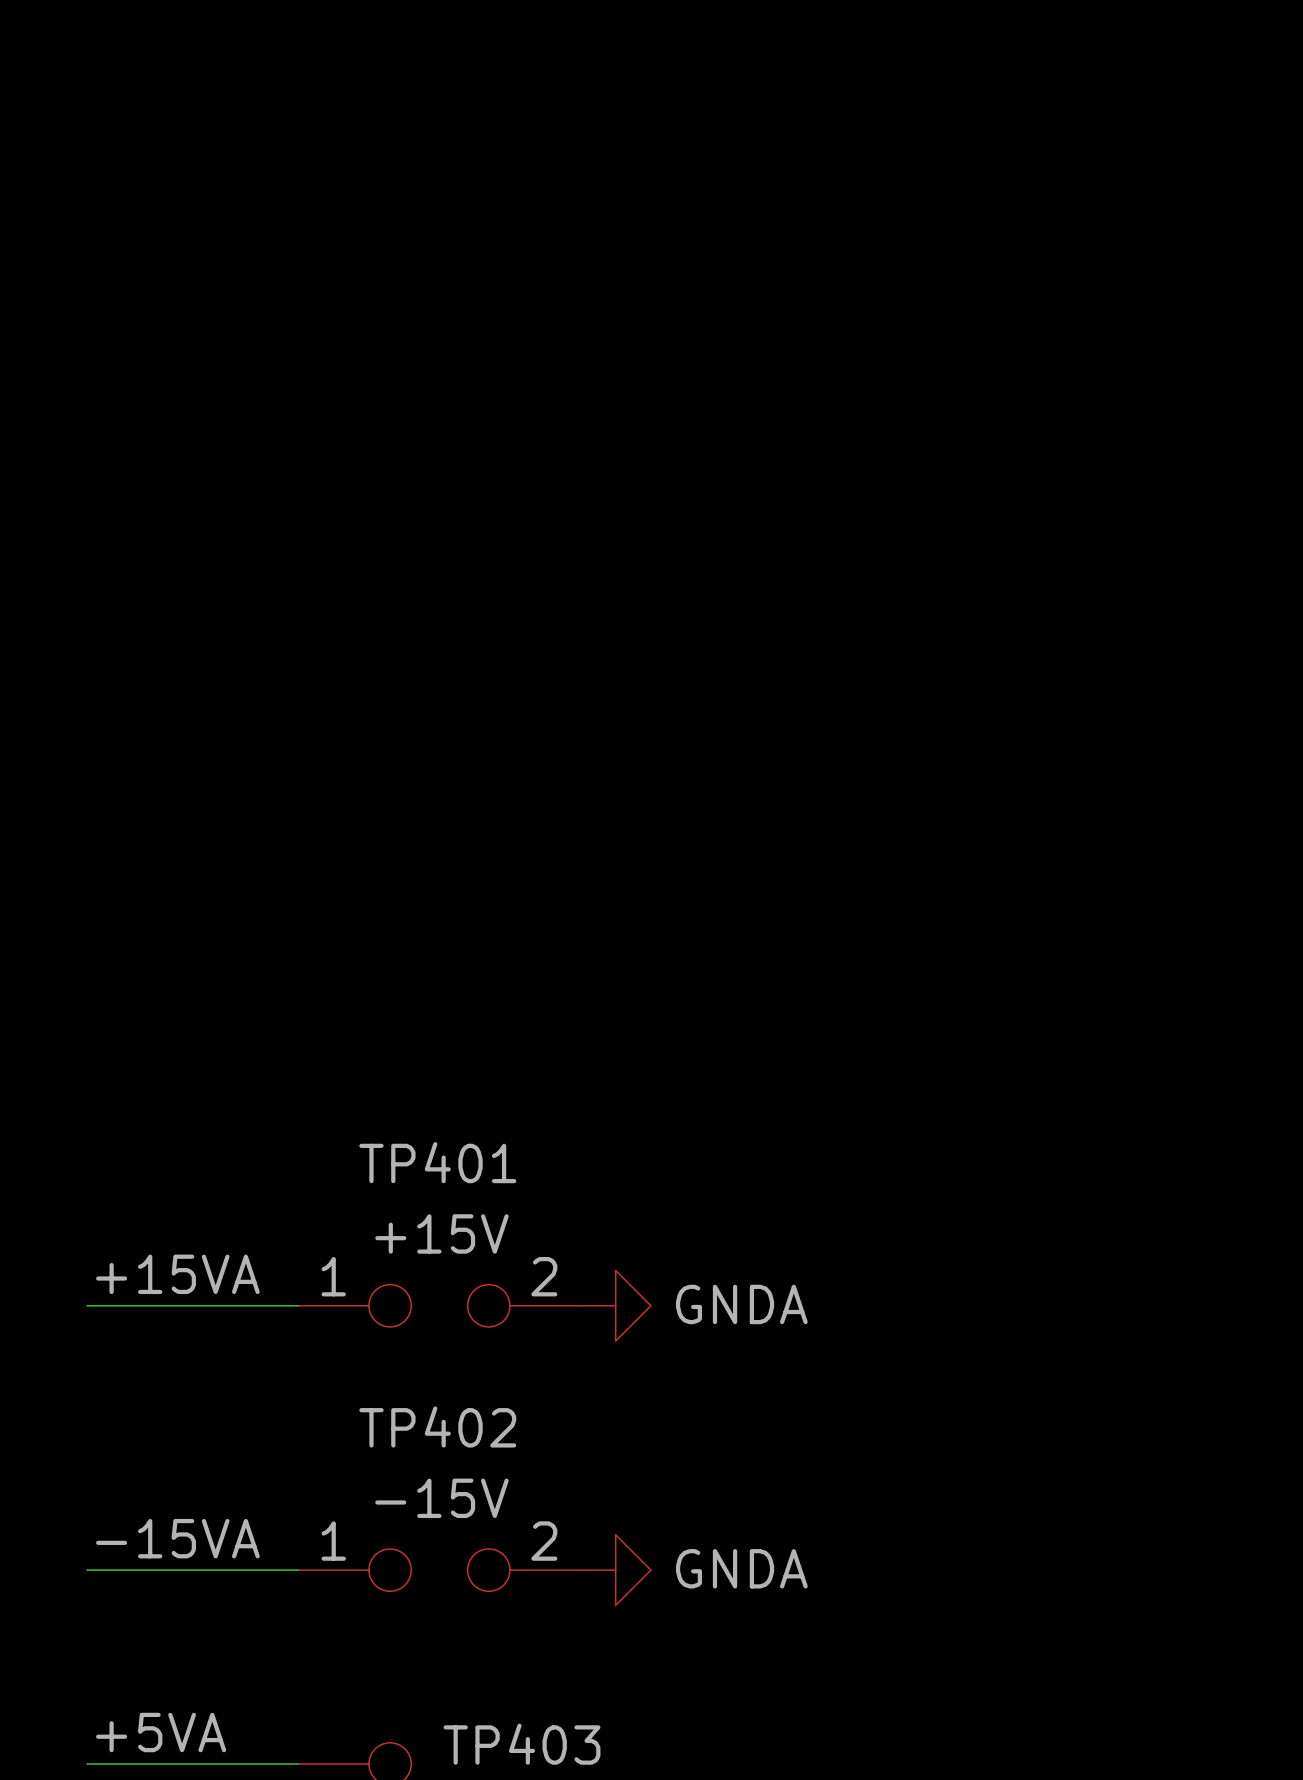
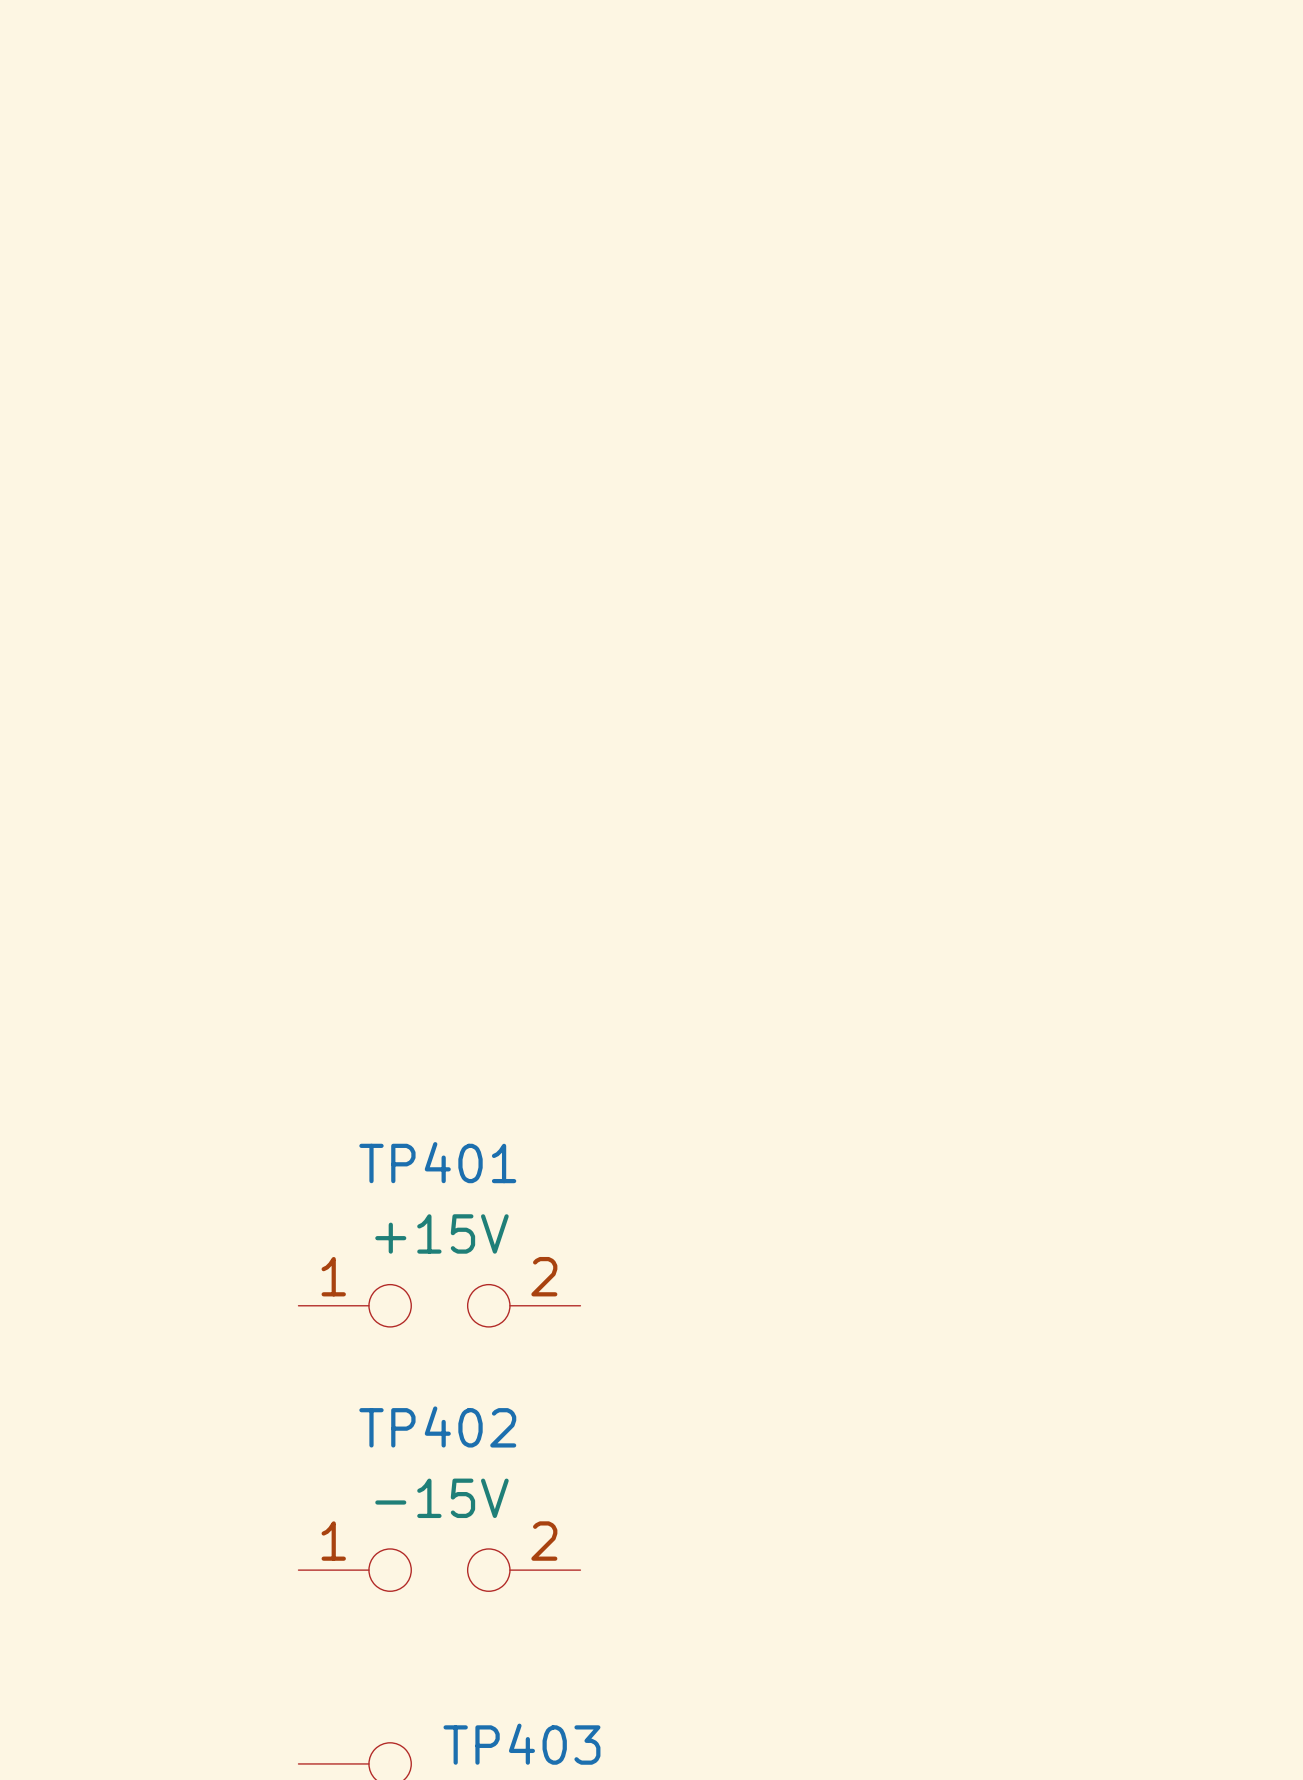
label: +15VA (177, 1274) -> none
wire: (87, 1305) (298, 1305) -> none
power symbol: GNDA (615, 1305) -> none
label: -15VA (177, 1538) -> none
wire: (87, 1570) (298, 1570) -> none
power symbol: GNDA (615, 1570) -> none
label: +5VA (161, 1732) -> none
wire: (87, 1763) (298, 1763) -> none

